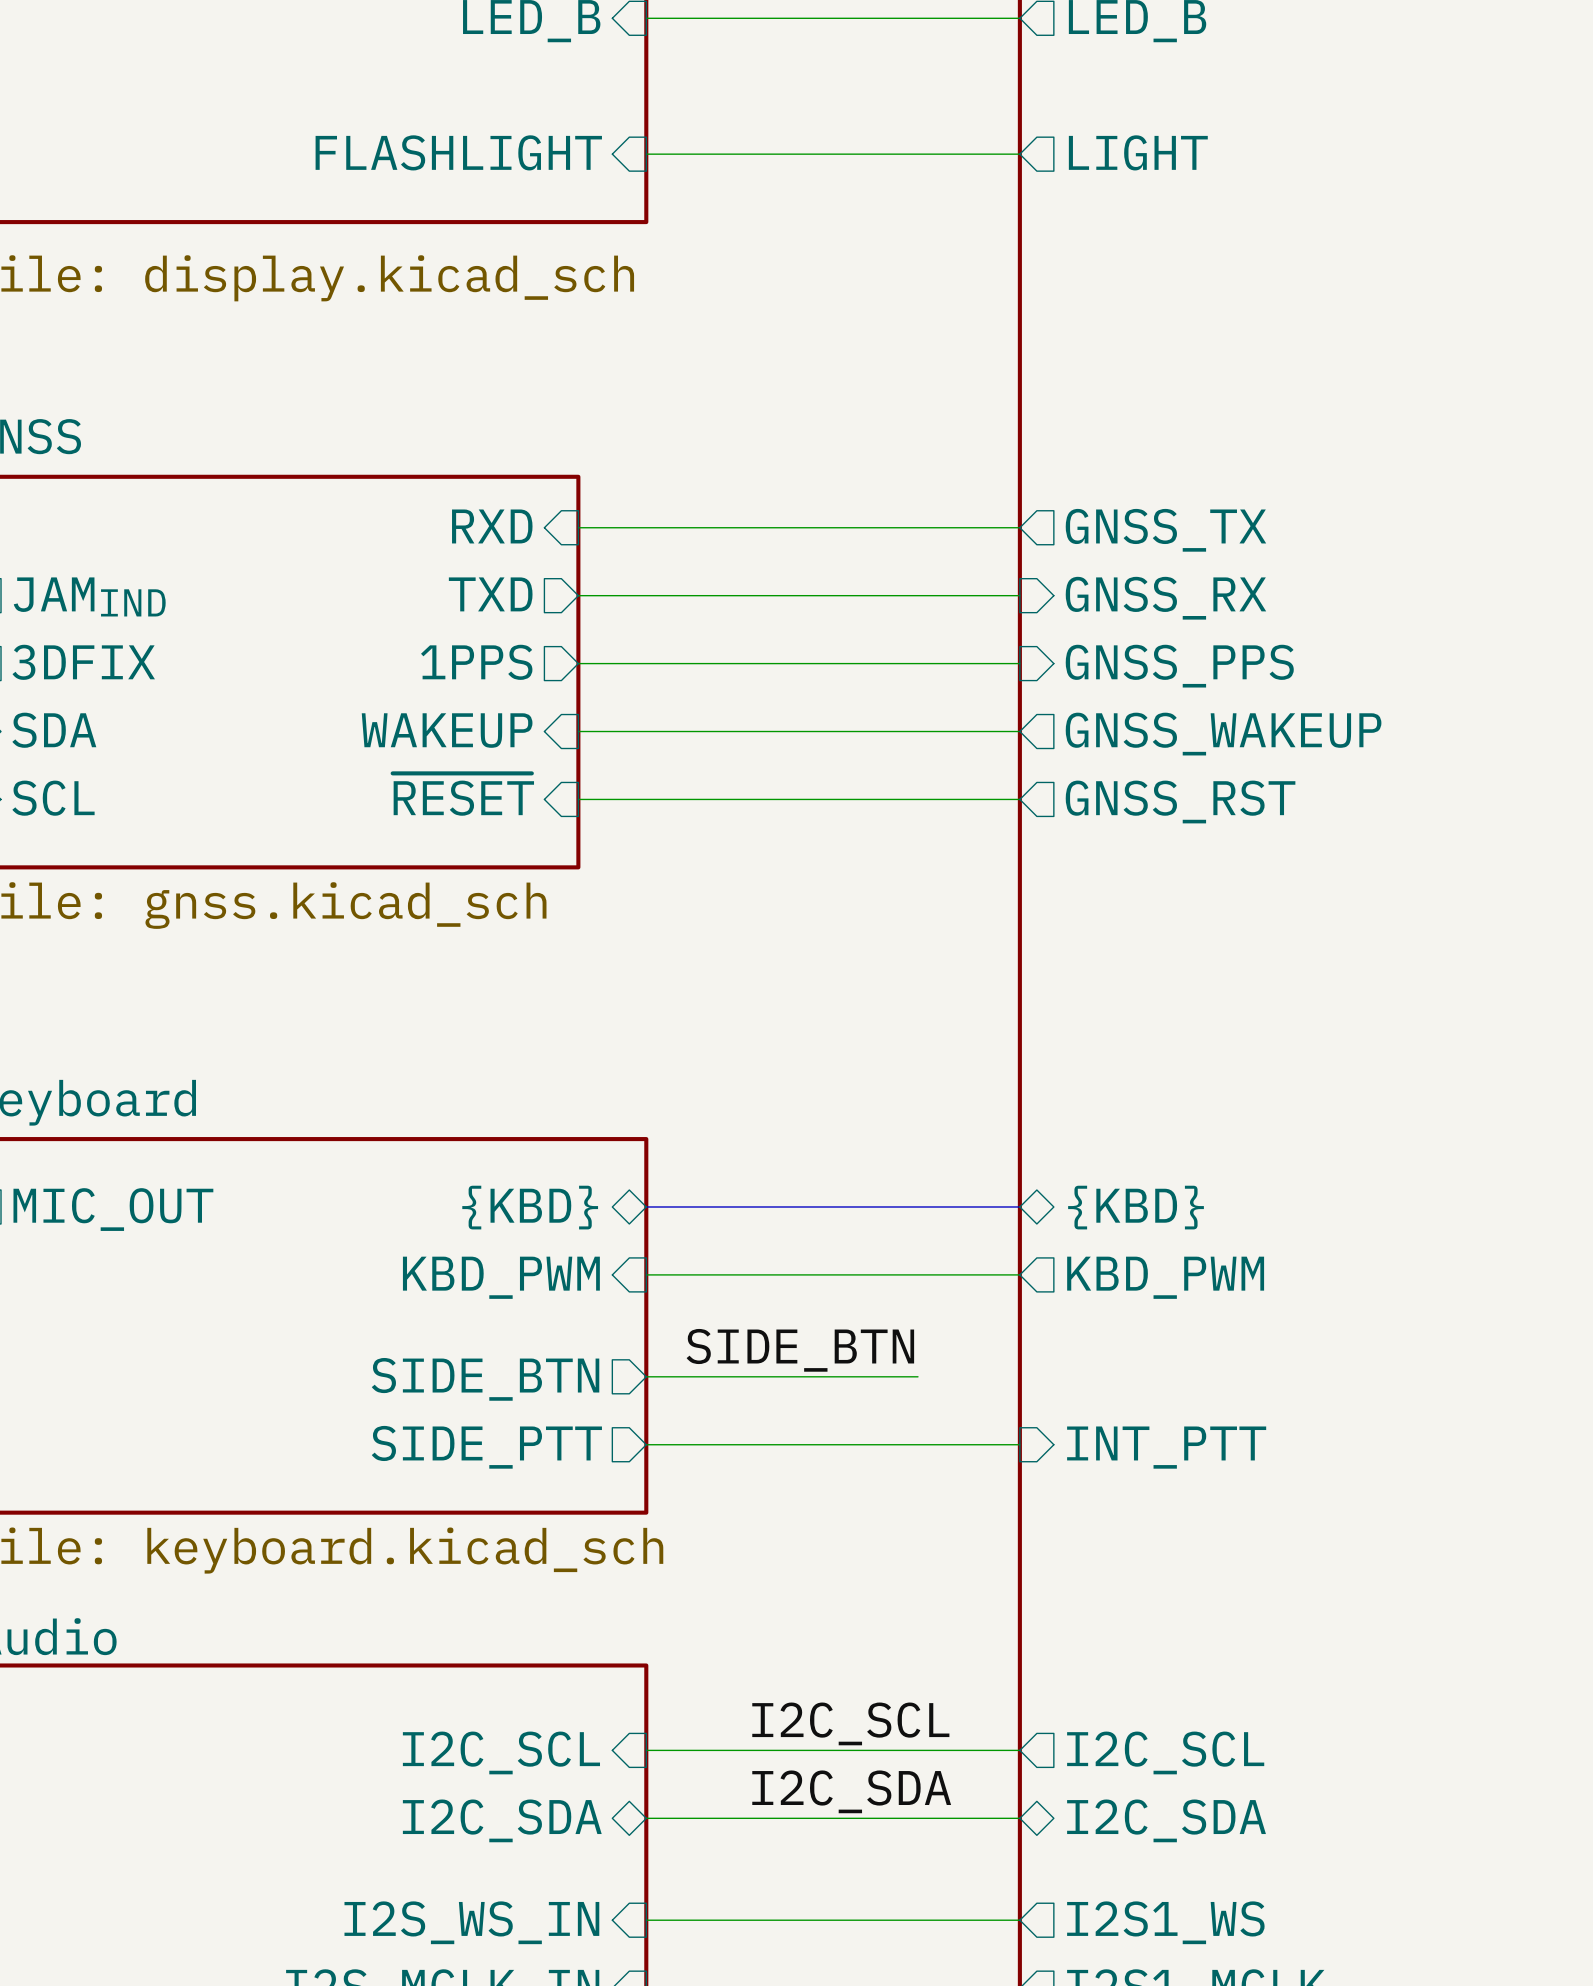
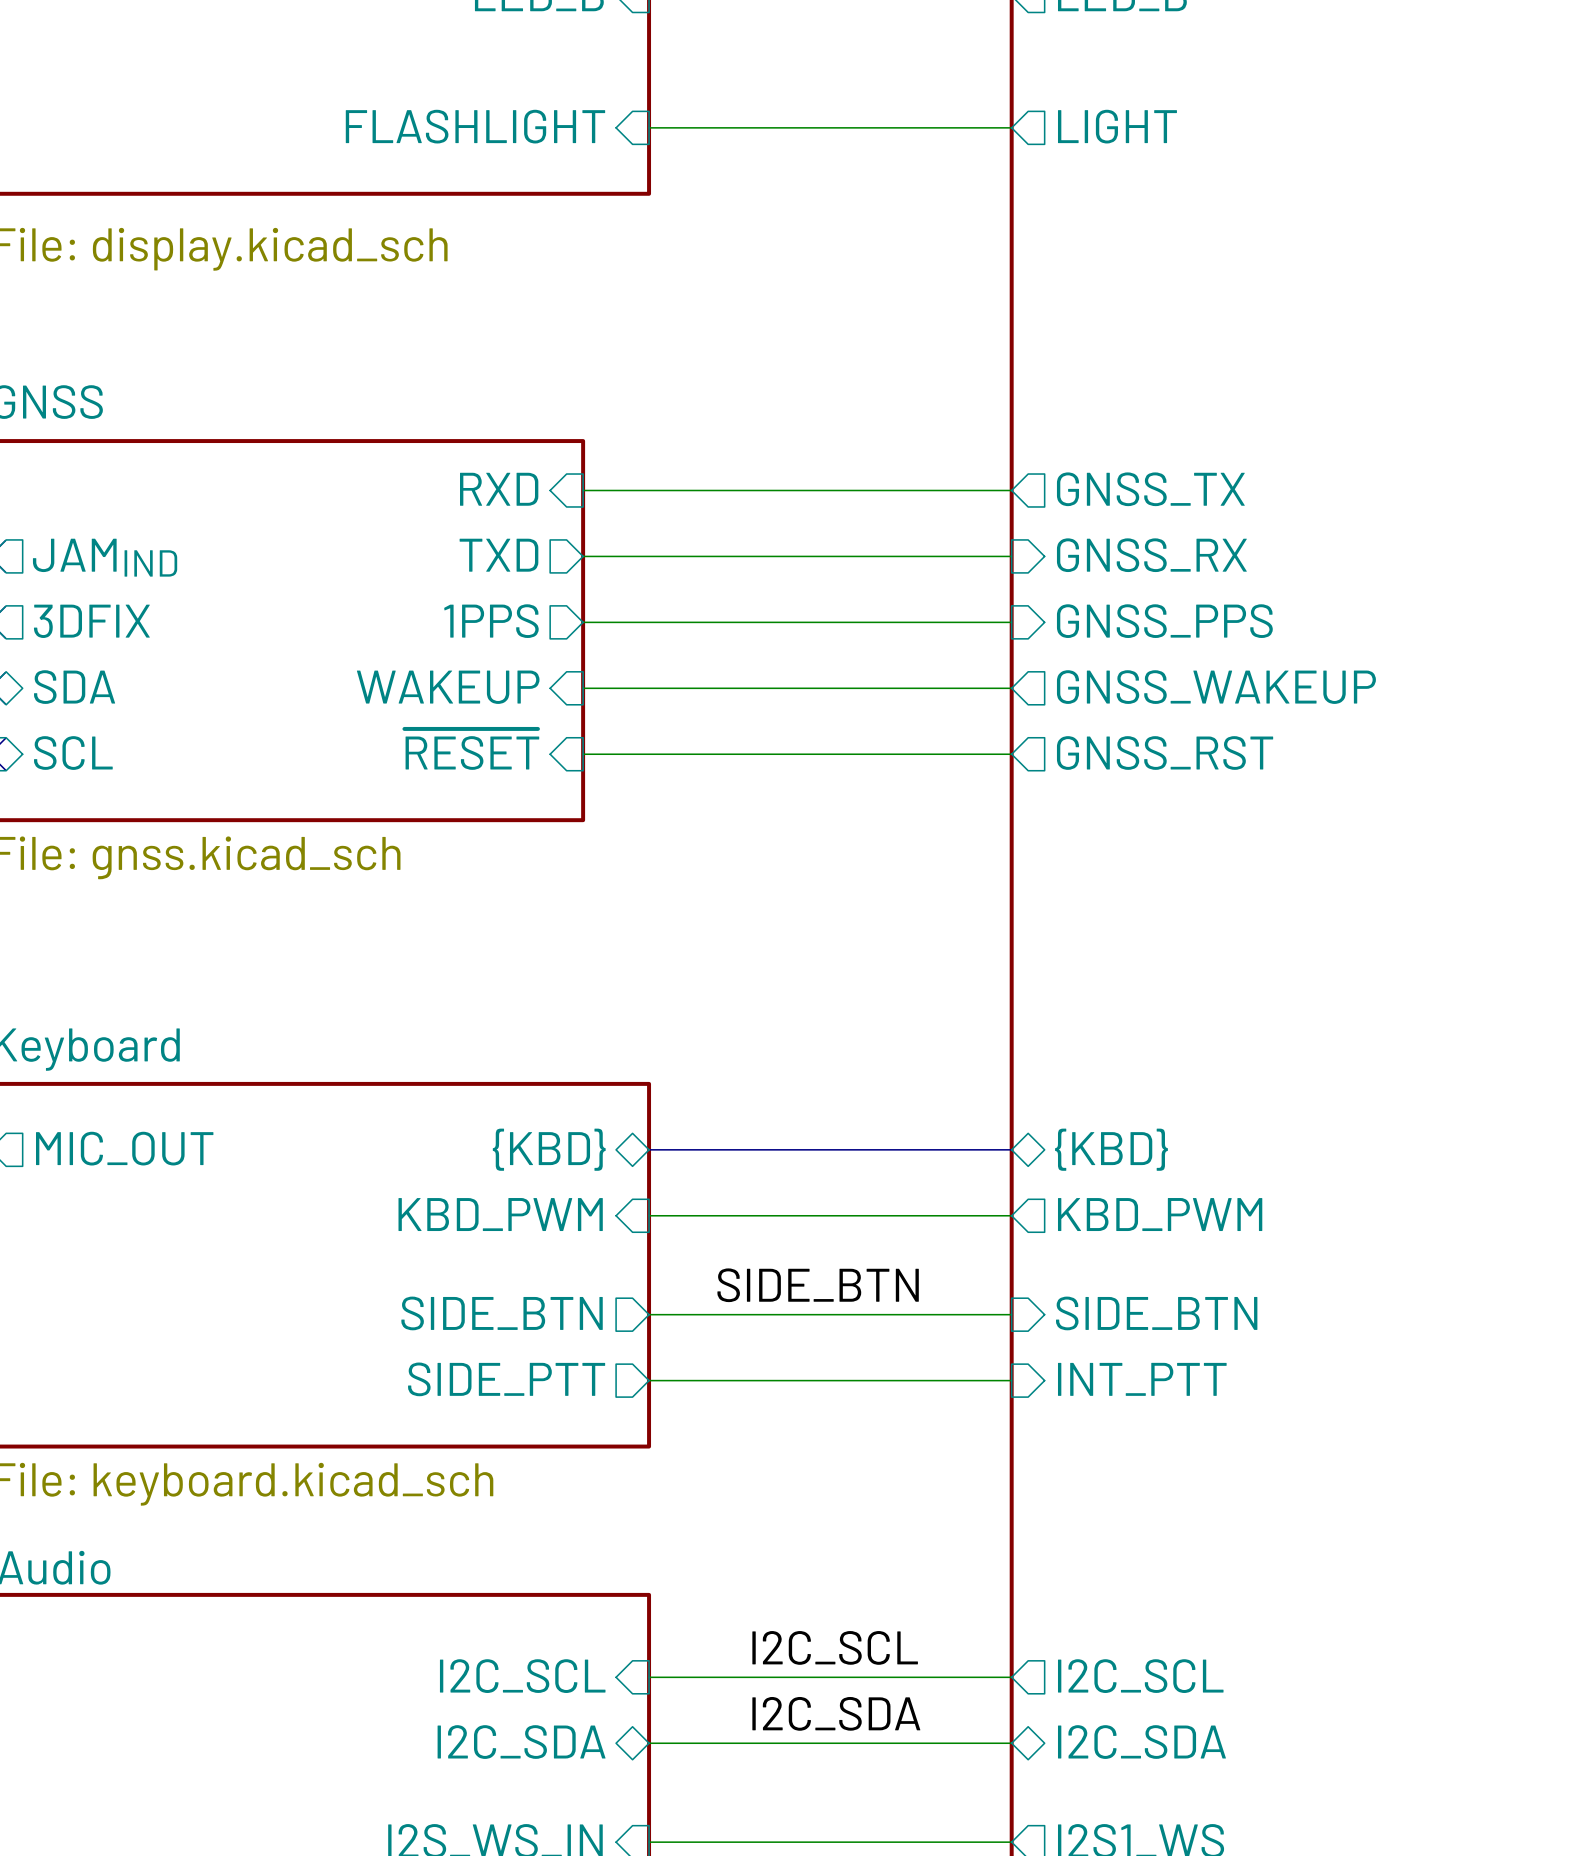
label position: SIDE_BTN (800, 1350) -> SIDE_BTN (818, 1285)
wire: none -> (912, 1314) (1011, 1314)
sheet pin: none -> SIDE_BTN (1156, 1313)

